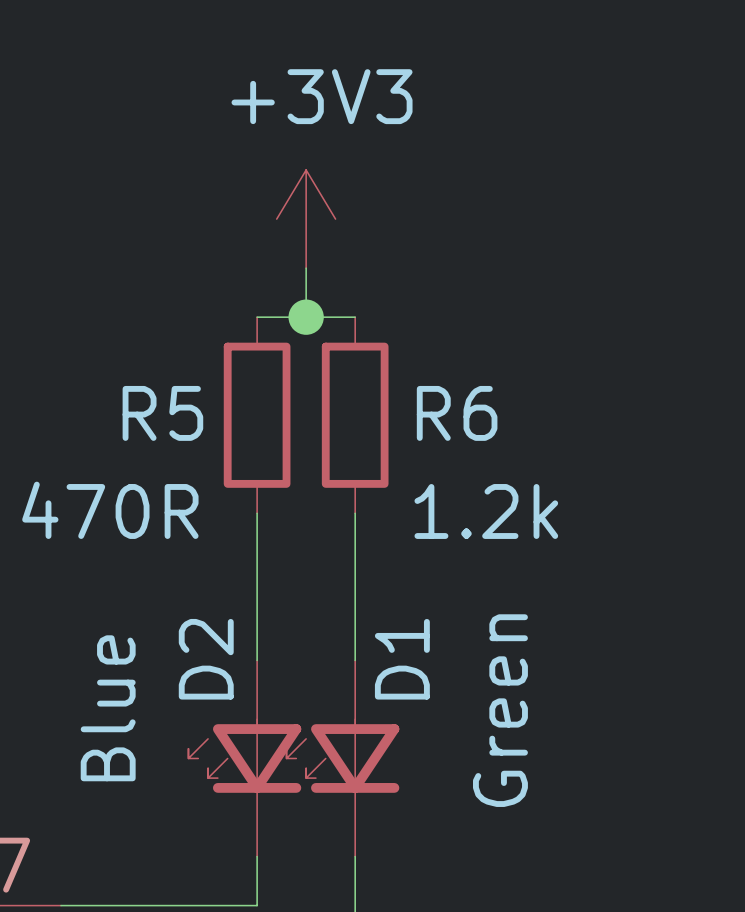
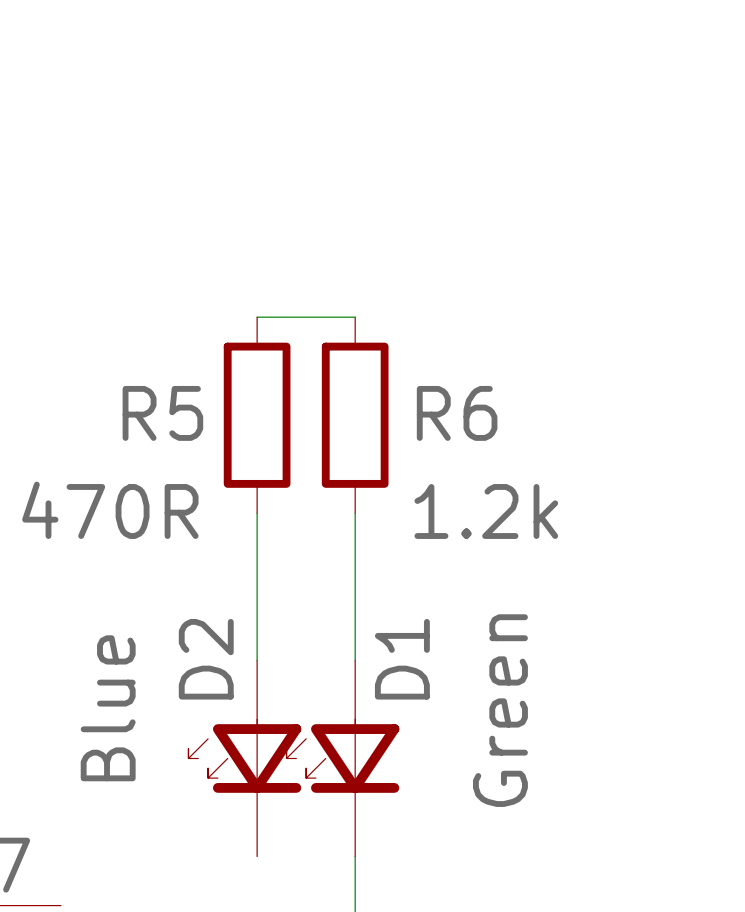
power symbol: +3V3 (306, 219) -> none
wire: (306, 268) (306, 317) -> none
junction: (306, 317) -> none
wire: (257, 856) (257, 905) (60, 905) -> none

